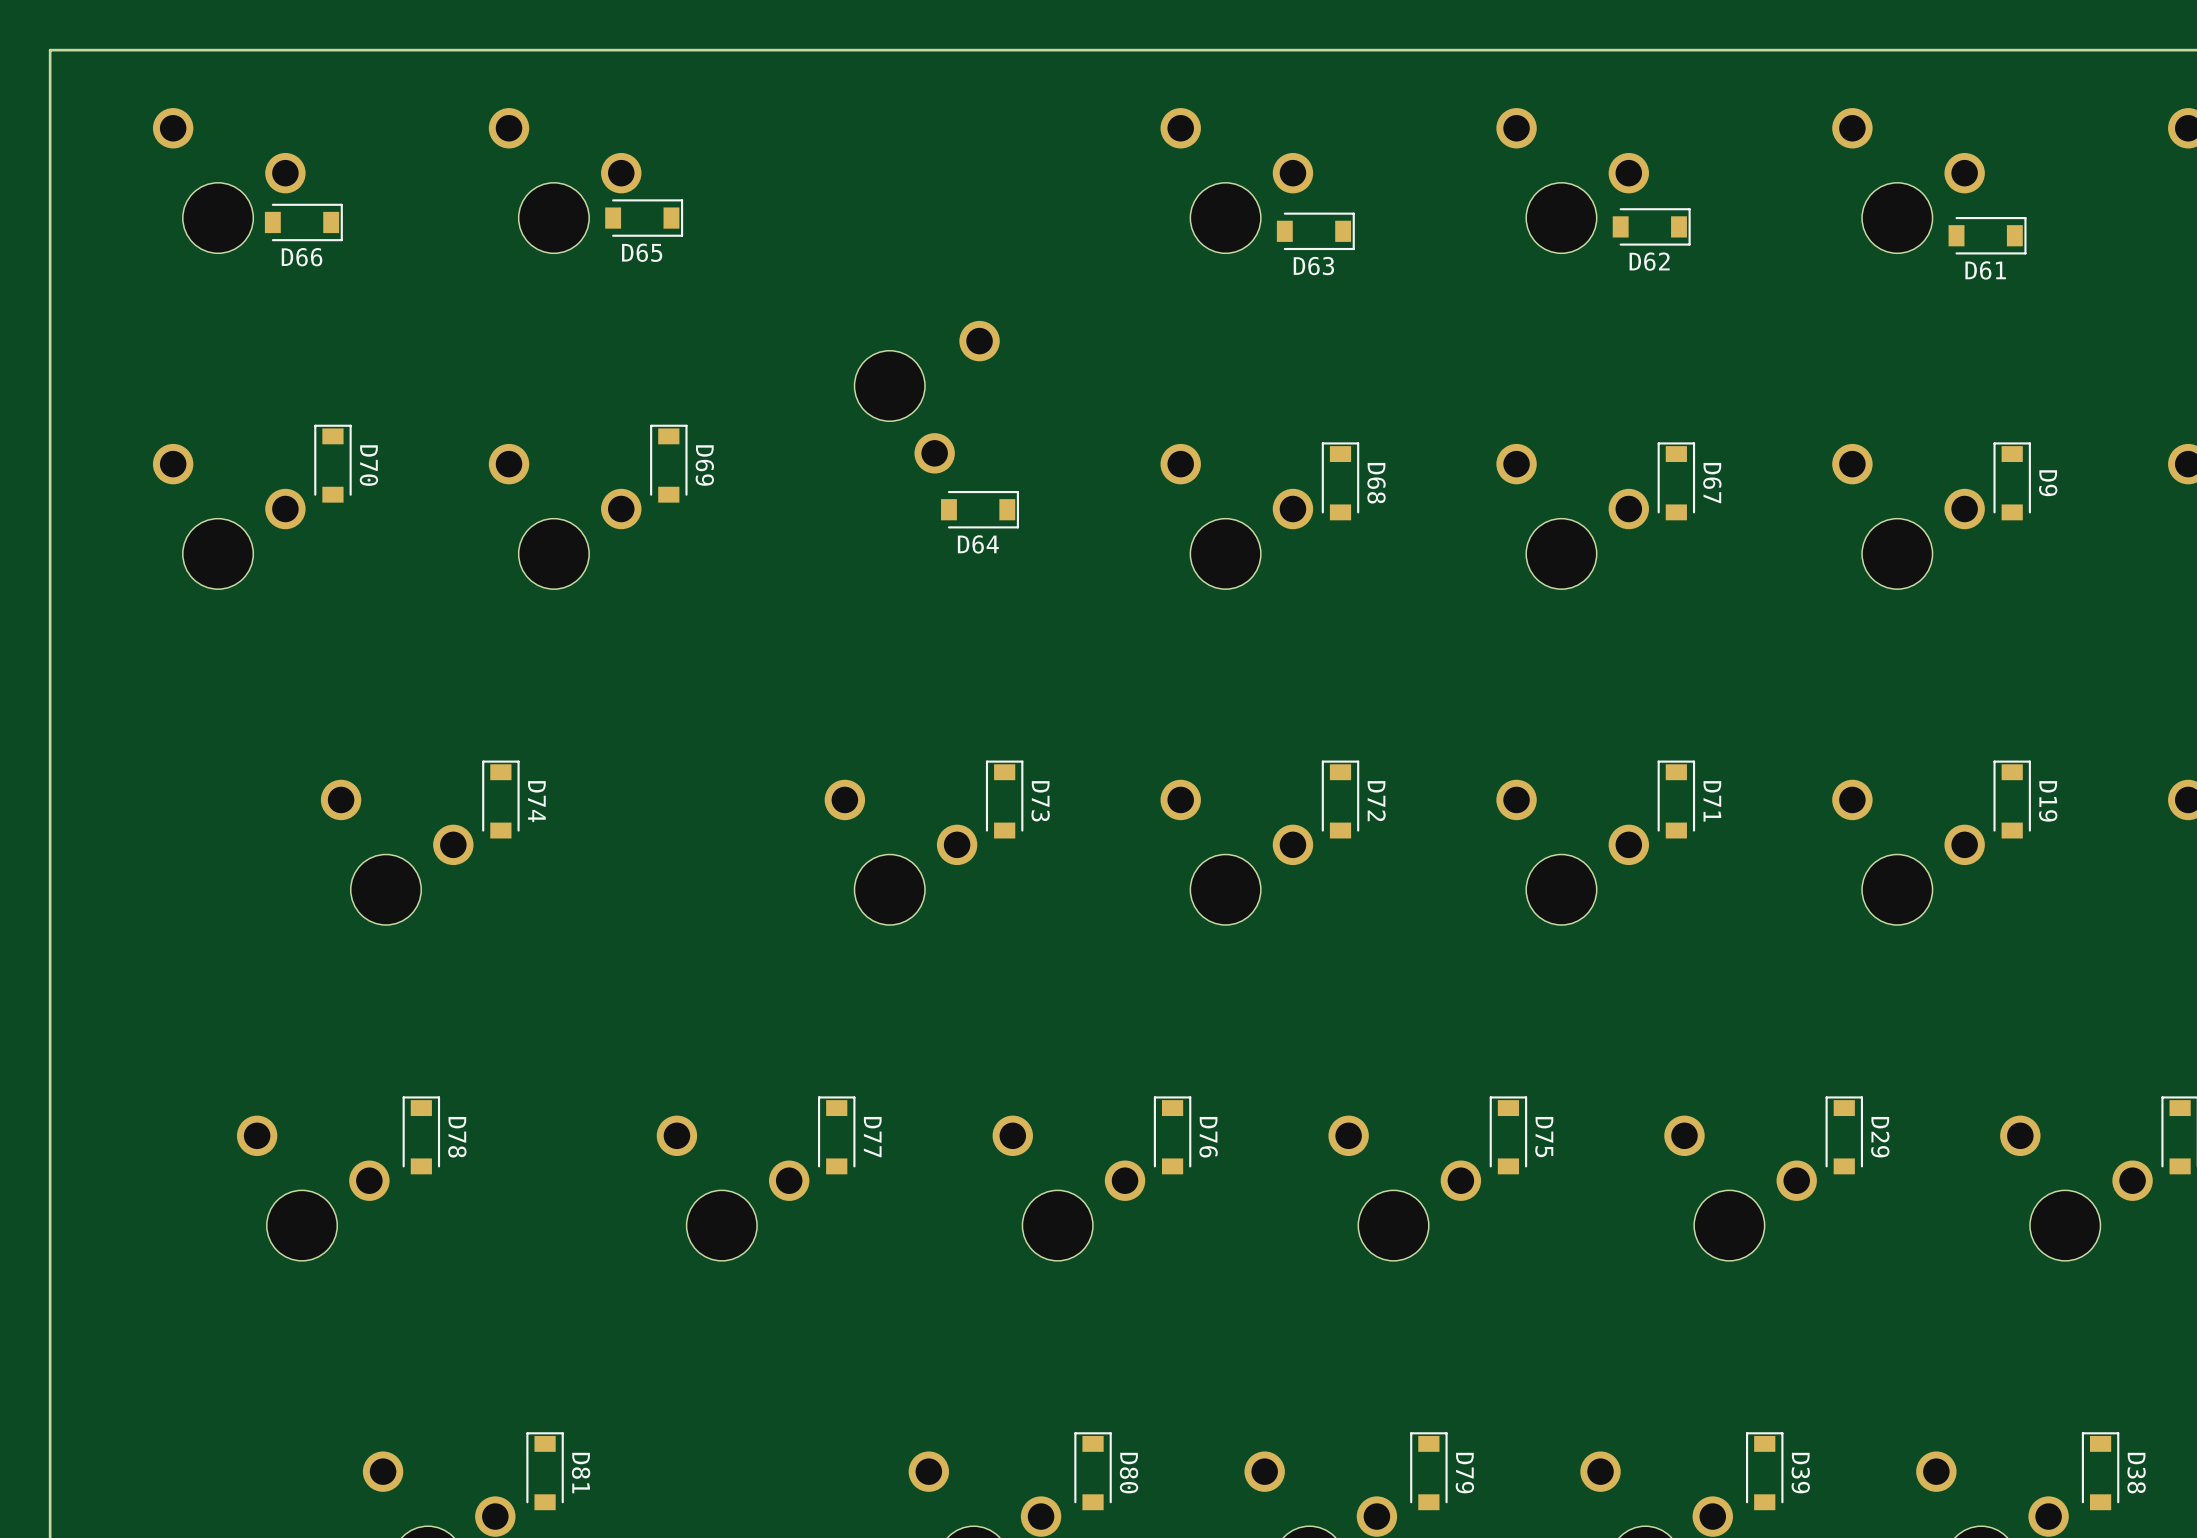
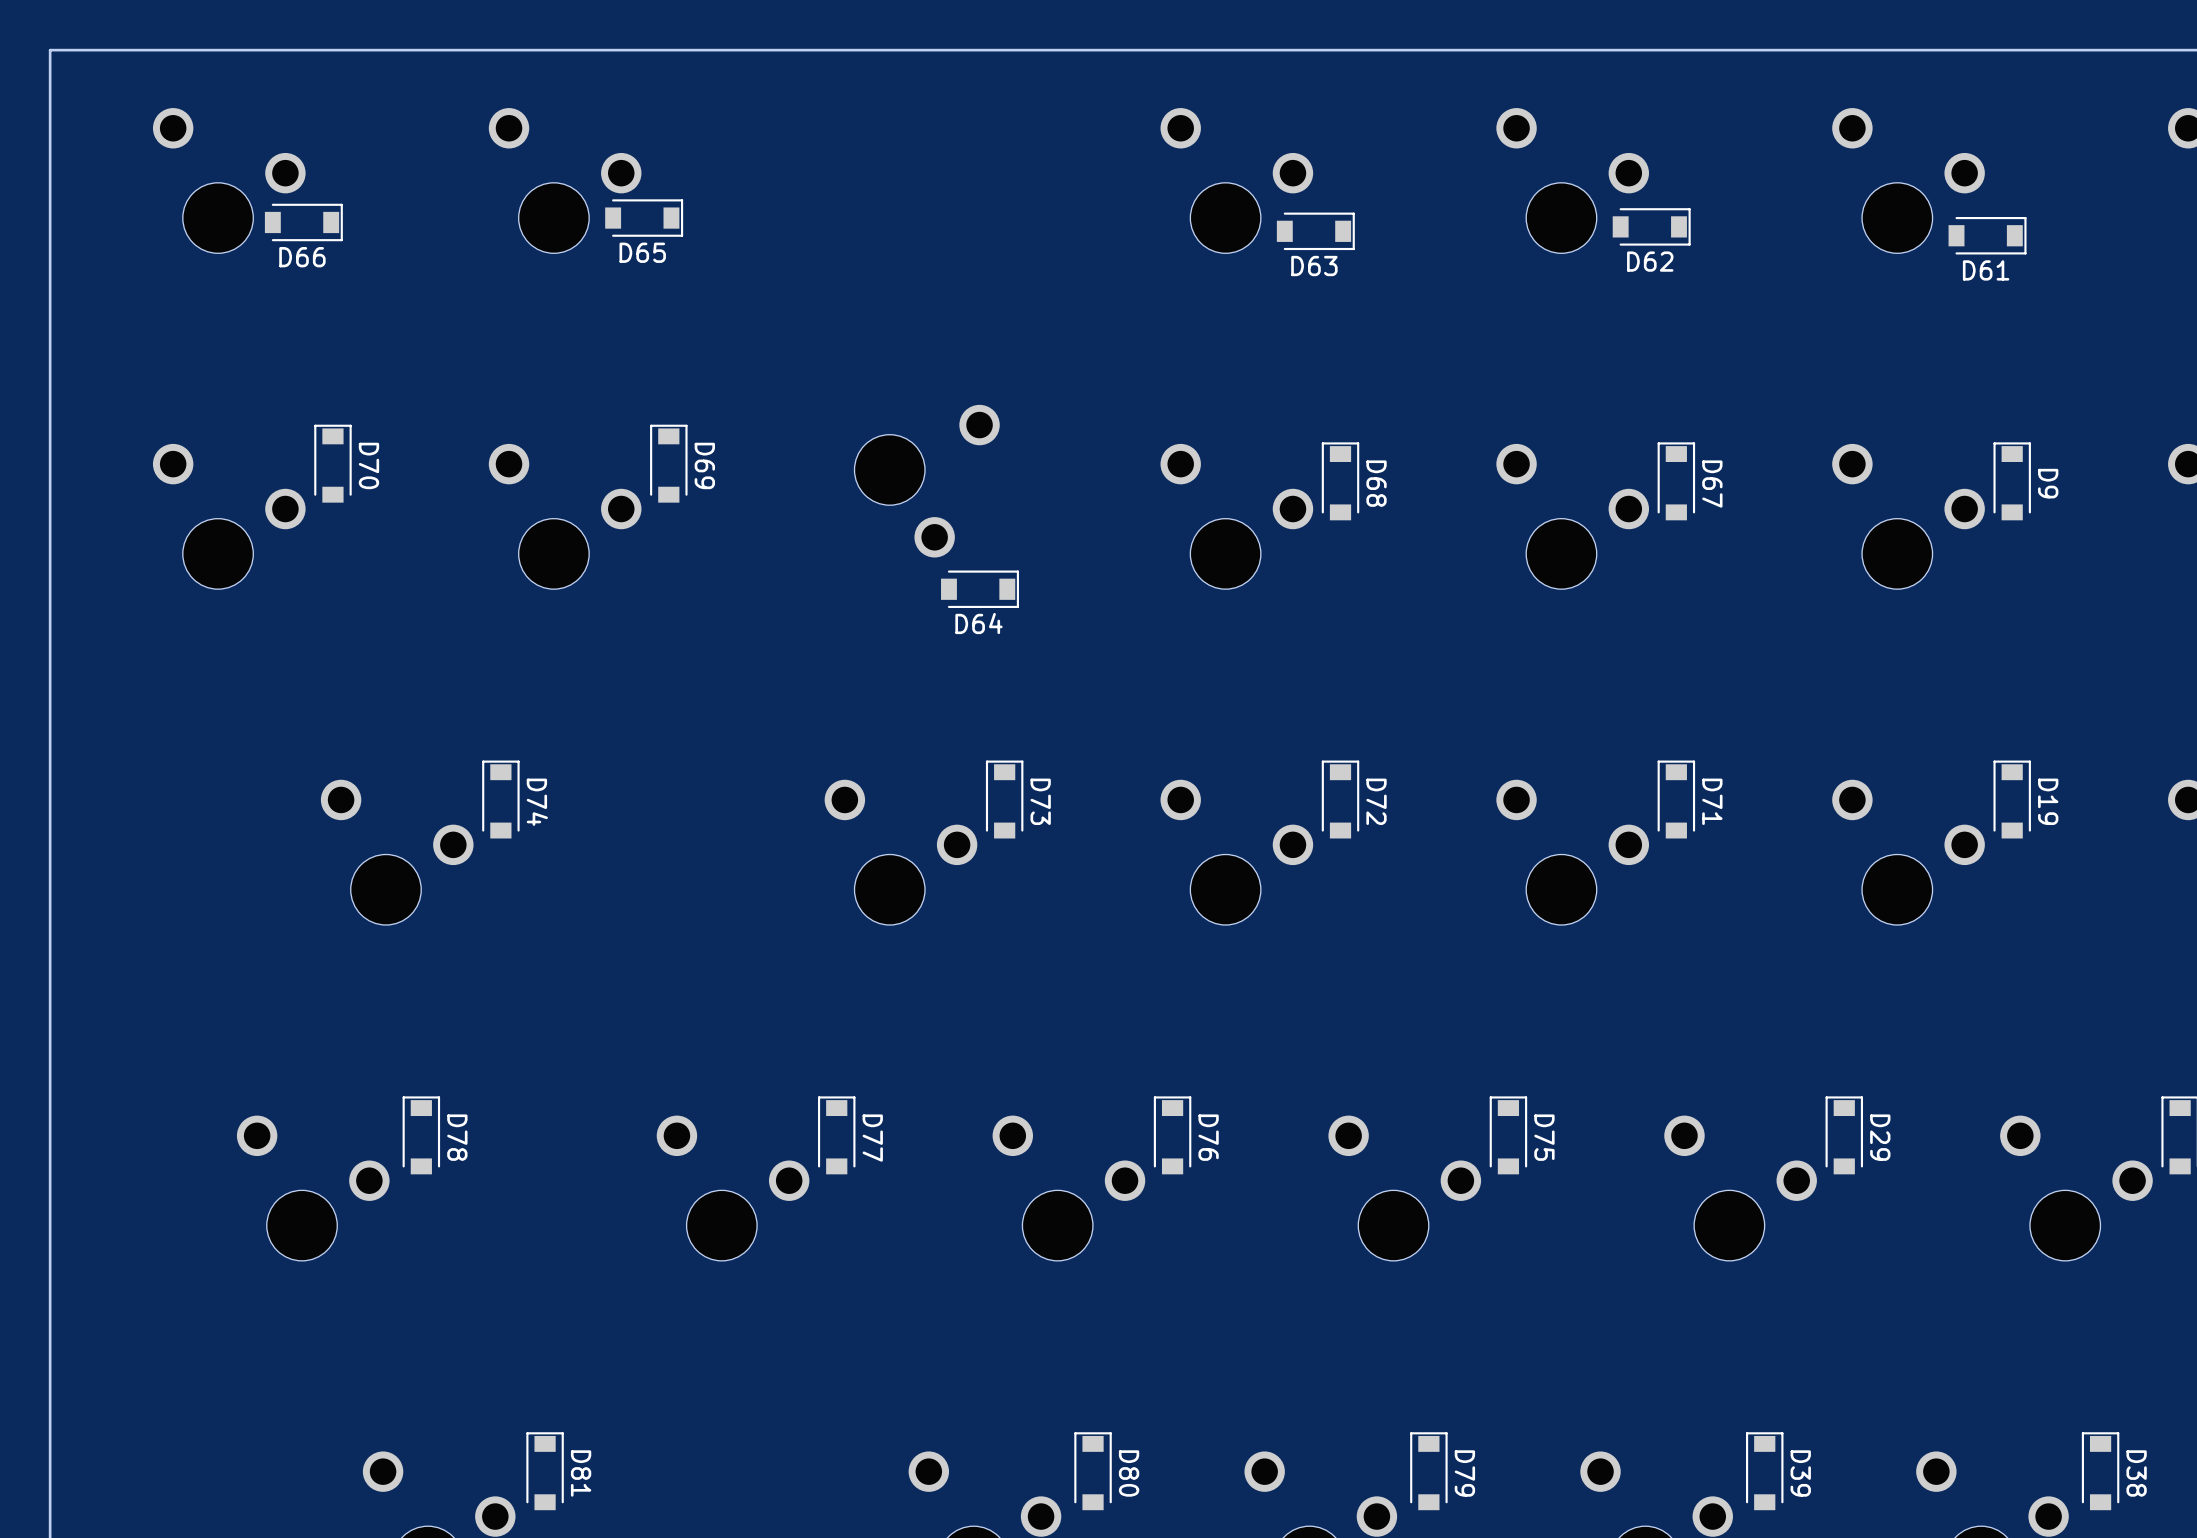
part position: (927, 397) -> (927, 481)
D64 position: (979, 509) -> (979, 589)

